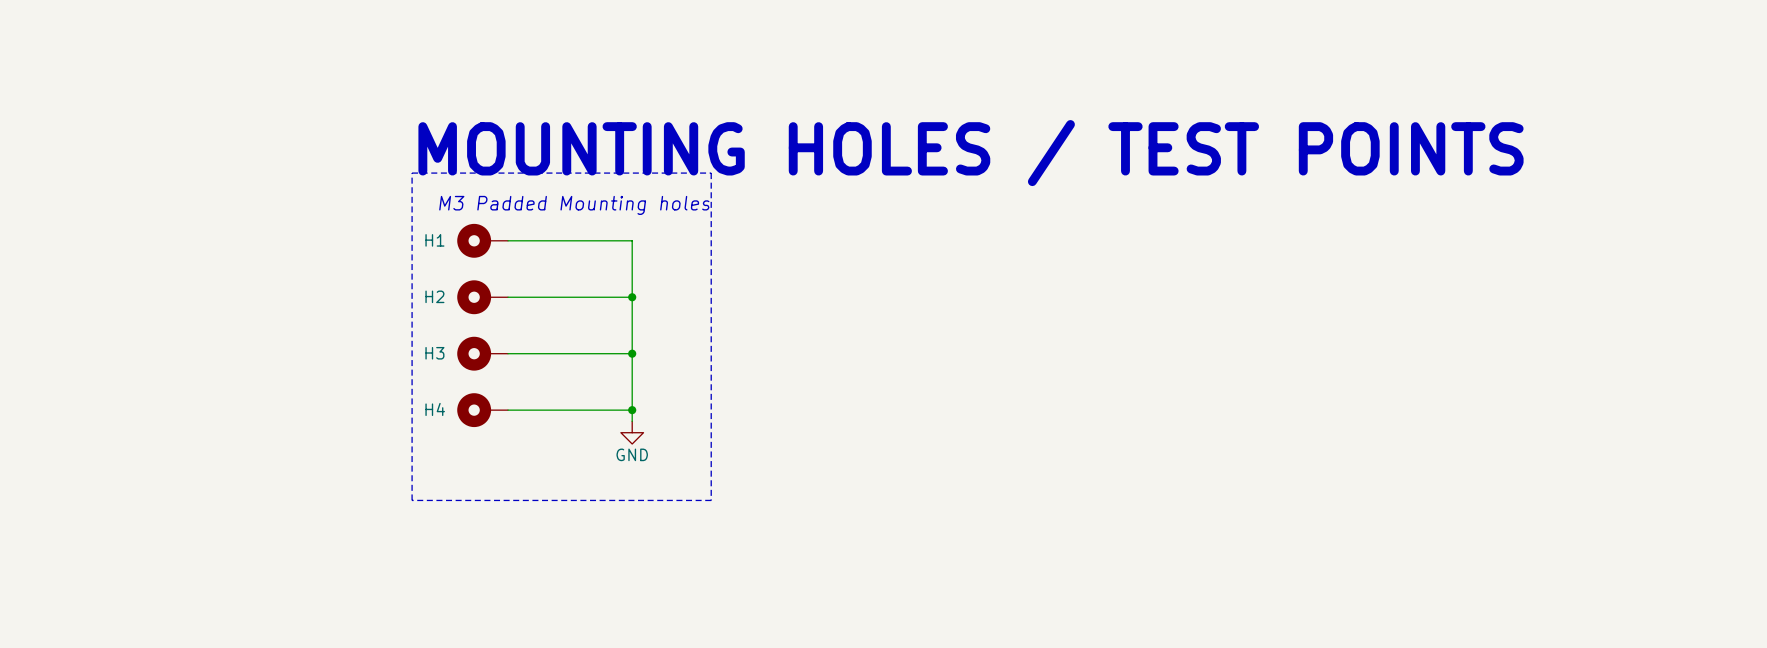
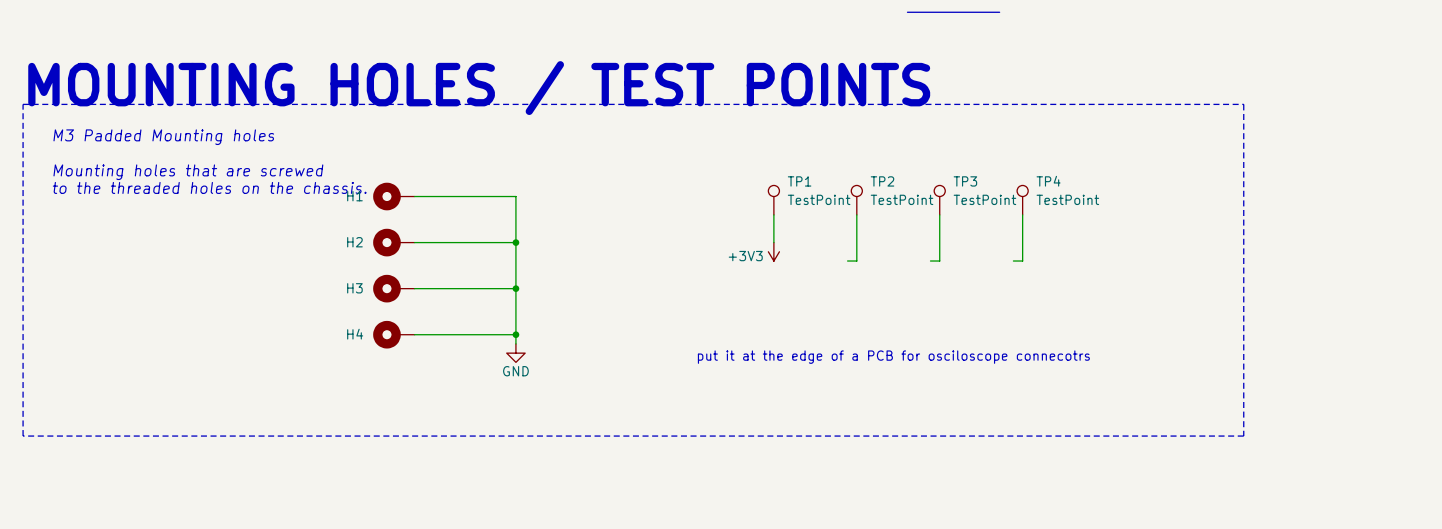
line: none -> (907, 12) (999, 12)
text: none -> MOUNTING HOLES / TEST POINTS (479, 88)
line: none -> (23, 104) (1243, 104) (1243, 436) (23, 436) (23, 104)
text: MOUNTING HOLES / TEST POINTS (970, 153) -> none
text: none -> M3 Padded Mounting holes (163, 137)
line: (412, 173) (711, 173) (711, 500) (412, 500) (412, 173) -> none
text: M3 Padded Mounting holes (574, 205) -> none
text: none -> Mounting holes that are screwed (188, 172)
text: none -> to the threaded holes on the chassis. (209, 187)
TP1: none -> TestPoint (773, 200)
TP2: none -> TestPoint (856, 200)
TP3: none -> TestPoint (939, 200)
TP4: none -> TestPoint (1022, 200)
wire: none -> (773, 214) (773, 242)
wire: none -> (856, 214) (856, 261) (847, 261)
wire: none -> (939, 214) (939, 261) (930, 261)
wire: none -> (1022, 214) (1022, 261) (1013, 261)
power symbol: none -> +3V3 (773, 251)
text: none -> put it at the edge of a PCB for osciloscope connecotrs (893, 357)

